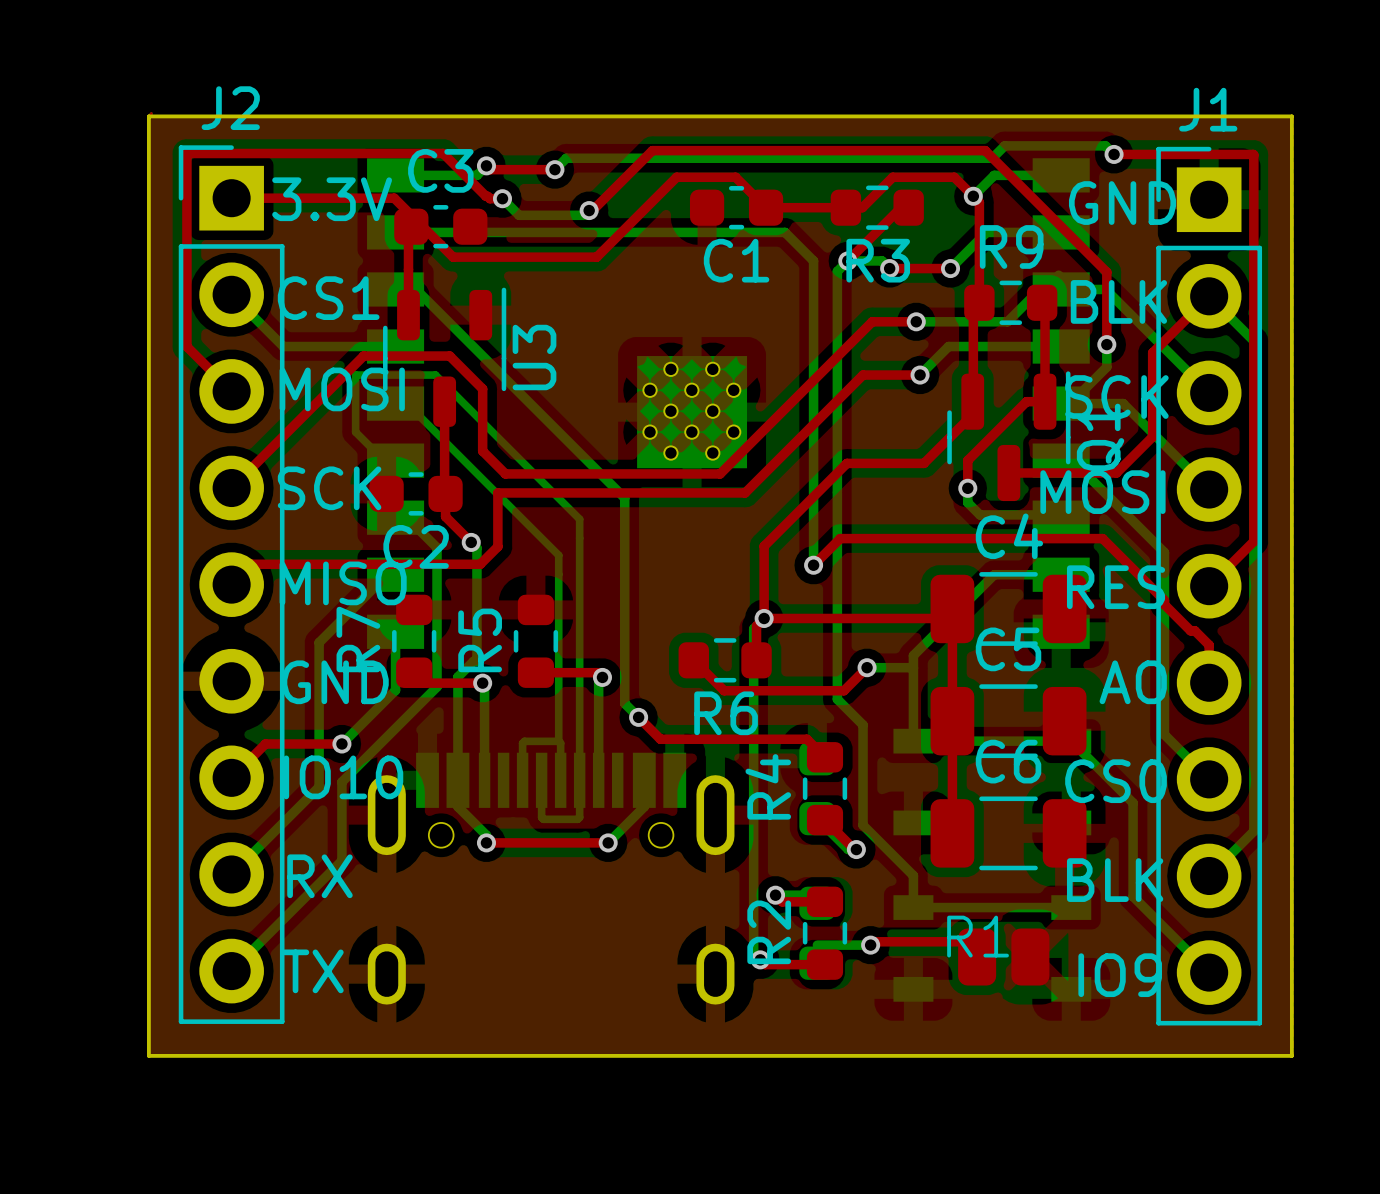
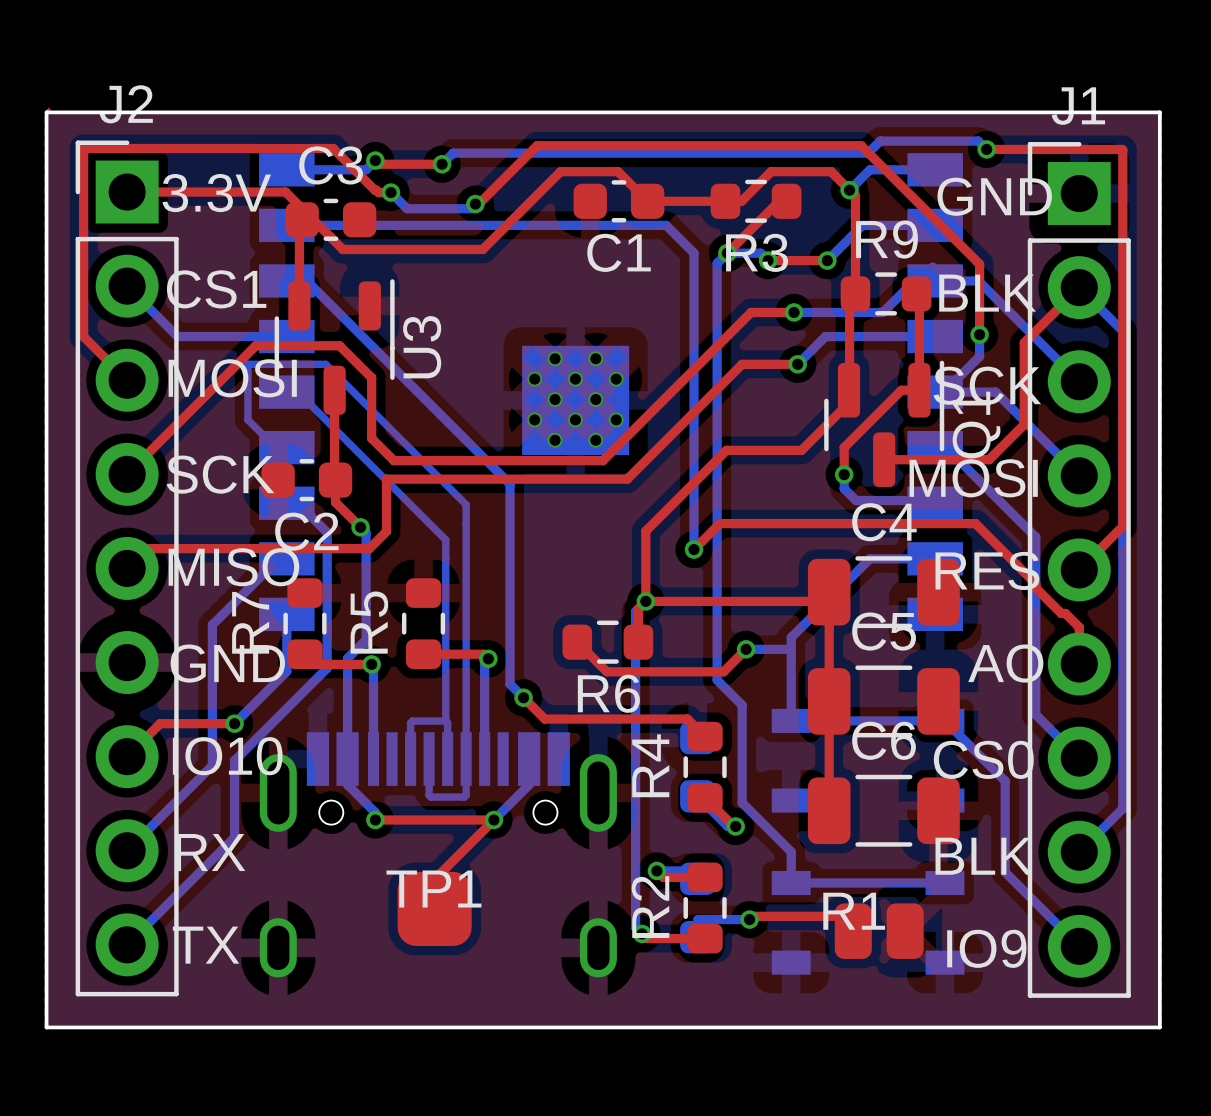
top track: none -> (493, 820) (434, 879) (434, 916)
TP1: none -> (434, 908)

